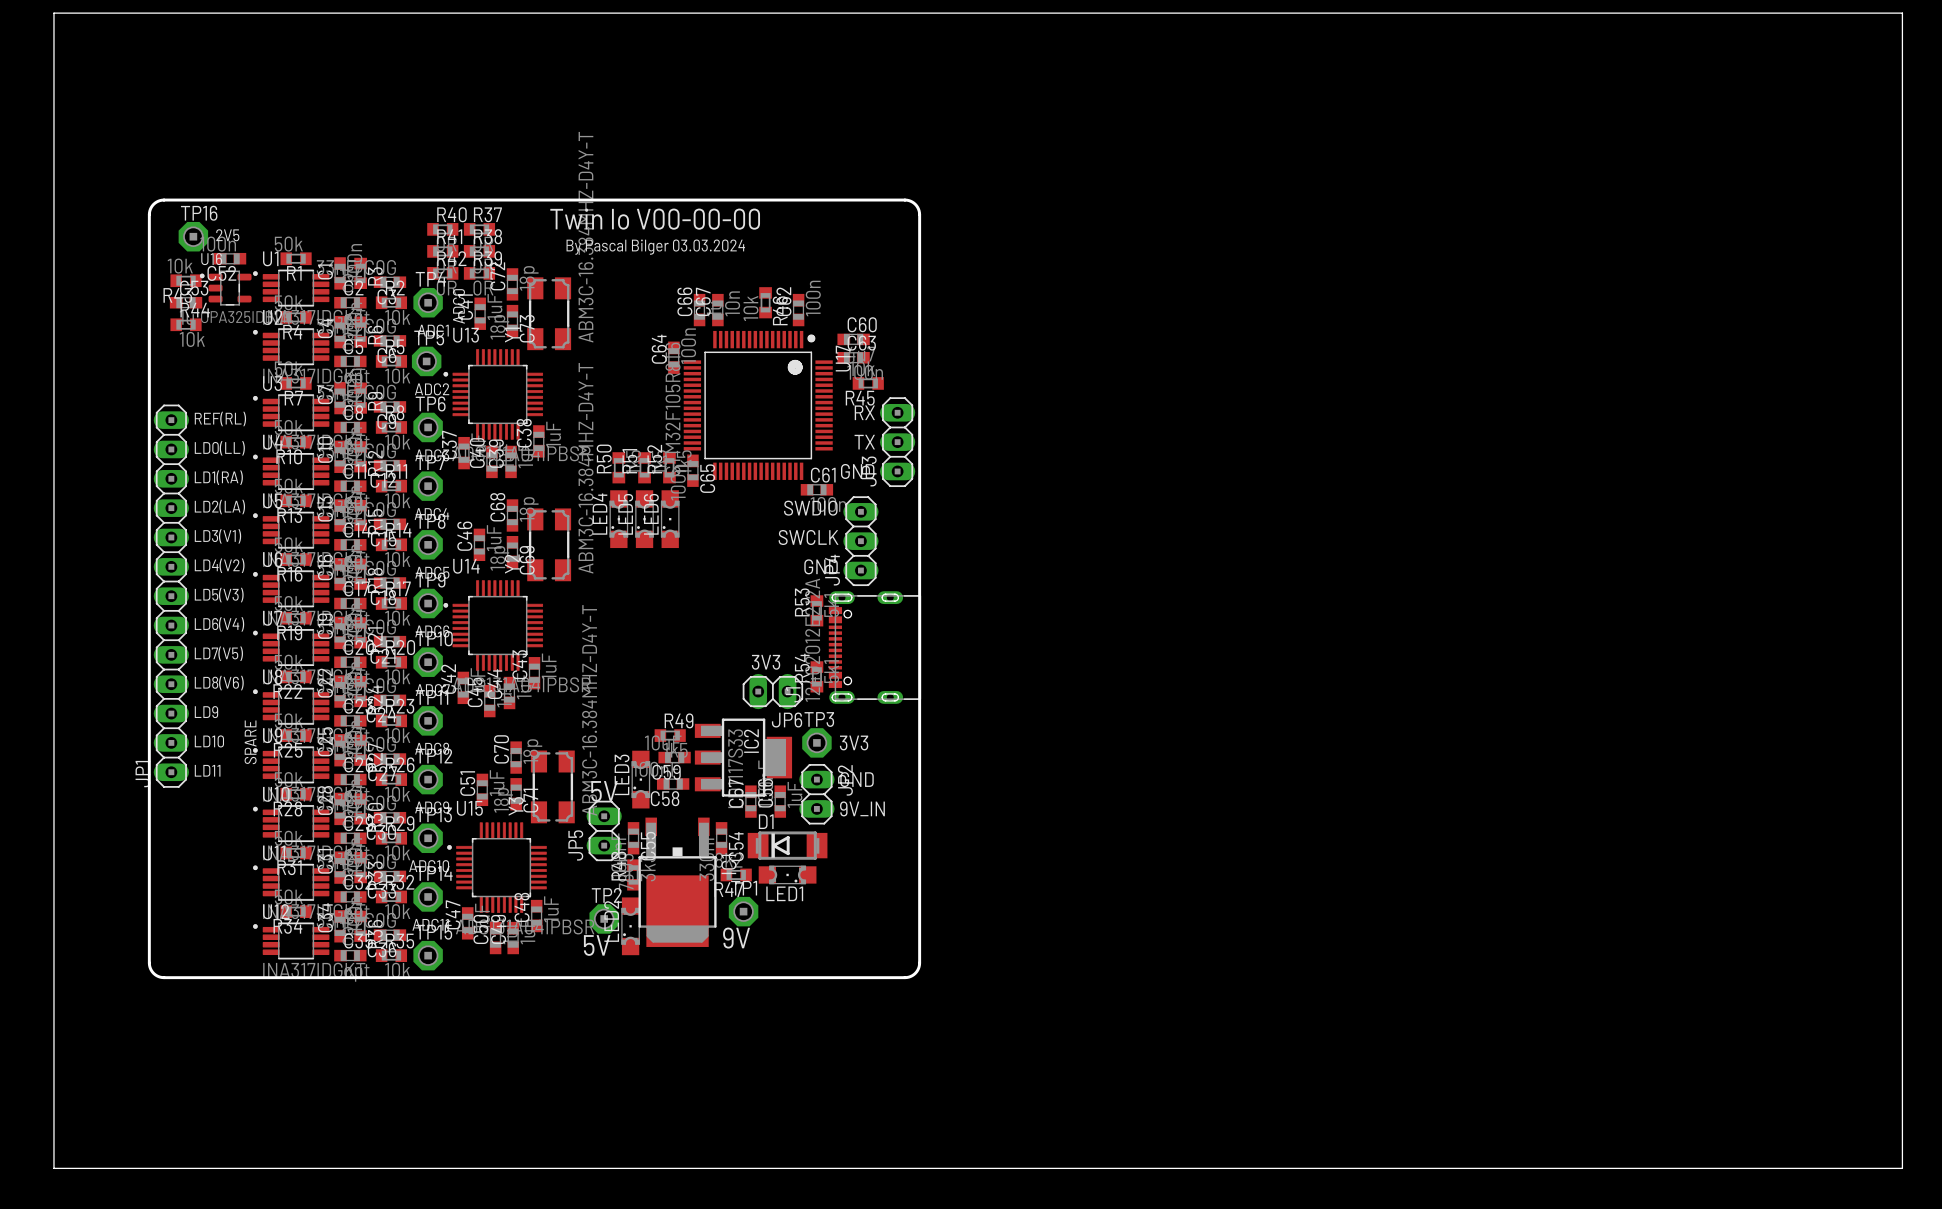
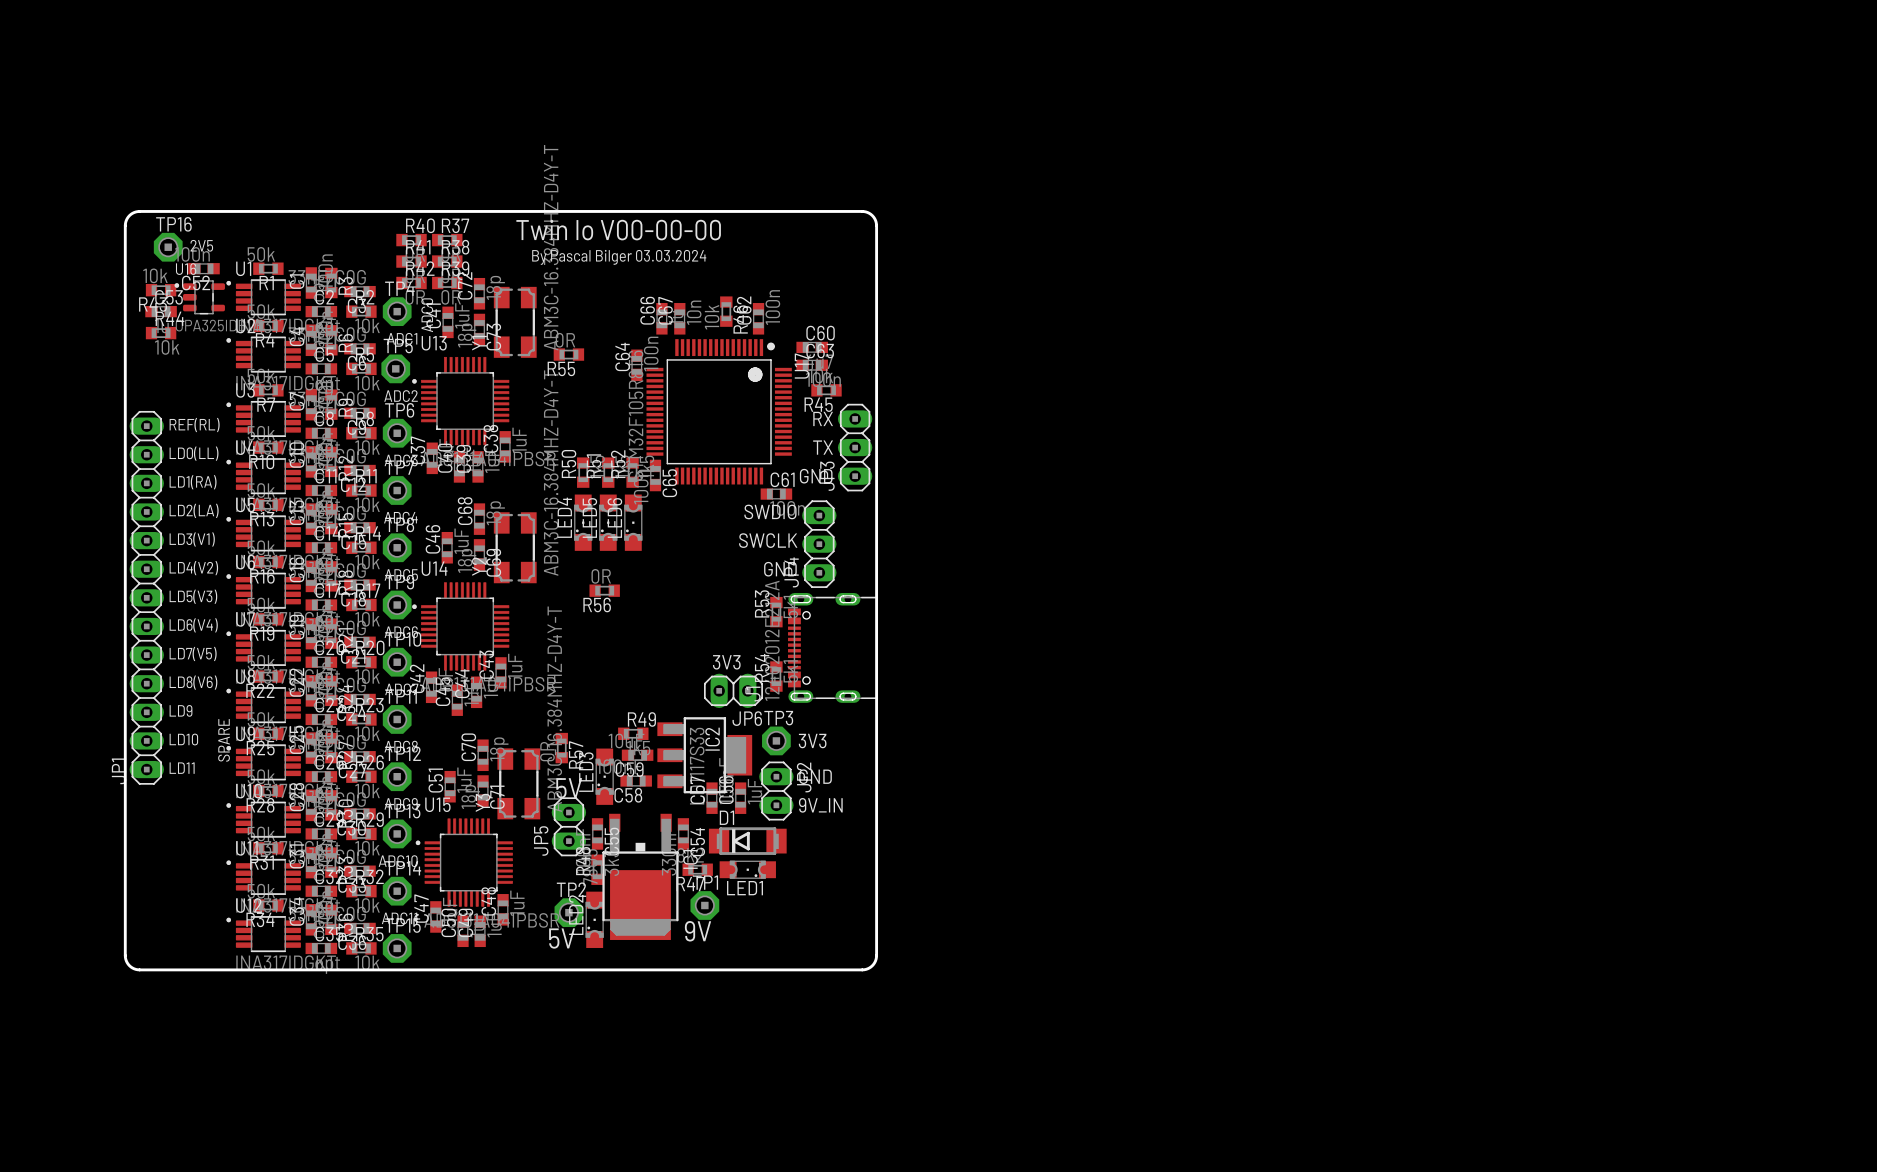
board edge: (53, 13) (1902, 13) (1902, 1168) (53, 1168) (53, 13) -> none
R55: none -> 0R (568, 354)
R56: none -> 0R (604, 590)
R57: none -> 0R (561, 748)

